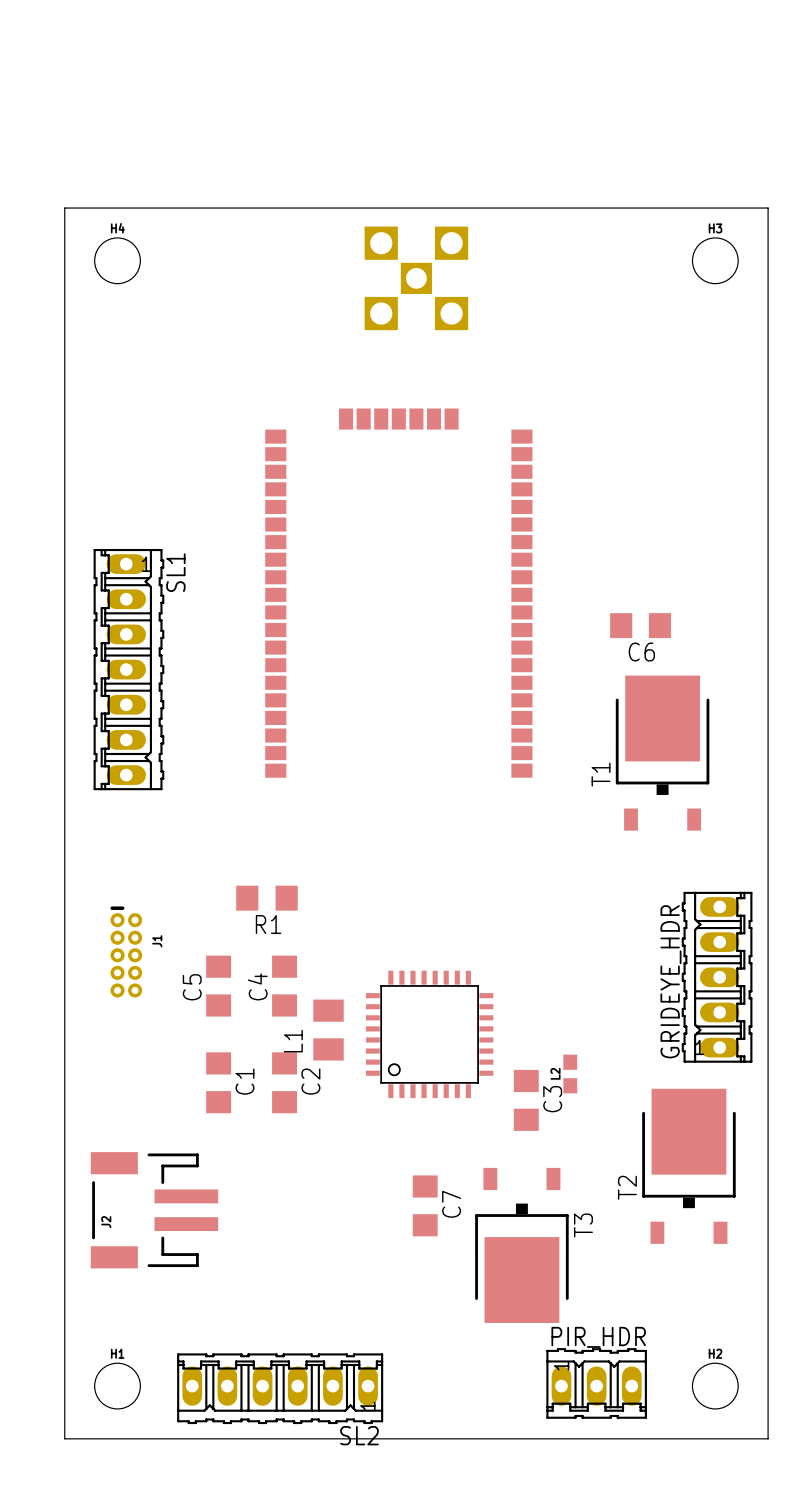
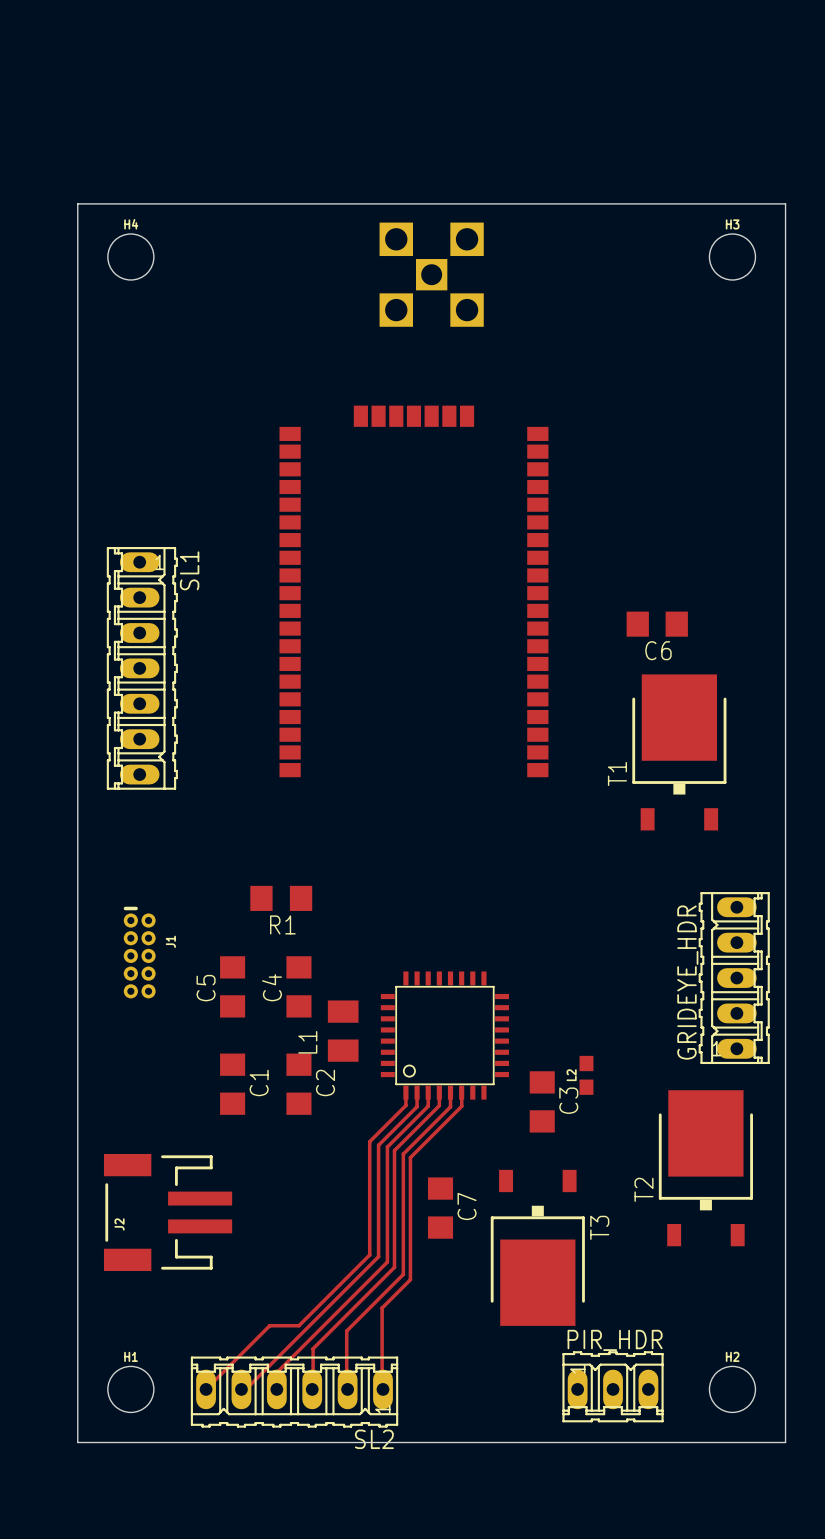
top track: none -> (405, 1092) (405, 1105) (369, 1141) (369, 1254) (298, 1325) (269, 1325) (206, 1389)
top track: none -> (417, 1092) (417, 1106) (378, 1145) (378, 1256) (245, 1389) (241, 1389)
top track: none -> (428, 1092) (428, 1106) (387, 1147) (387, 1262) (276, 1372) (276, 1389)
top track: none -> (439, 1092) (439, 1105) (394, 1150) (394, 1267) (313, 1348) (312, 1389)
top track: none -> (450, 1092) (450, 1106) (403, 1154) (403, 1274) (346, 1331) (347, 1389)
top track: none -> (461, 1092) (461, 1106) (410, 1157) (410, 1279) (382, 1308) (383, 1389)

